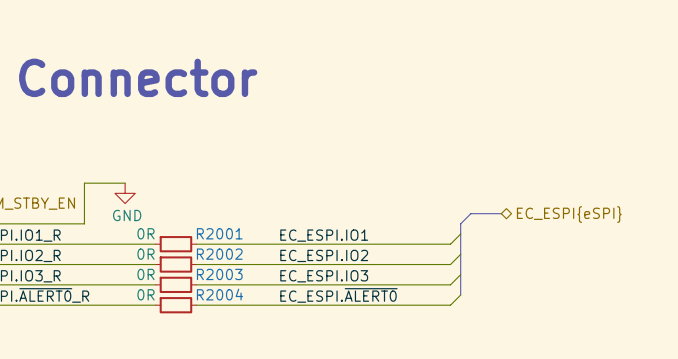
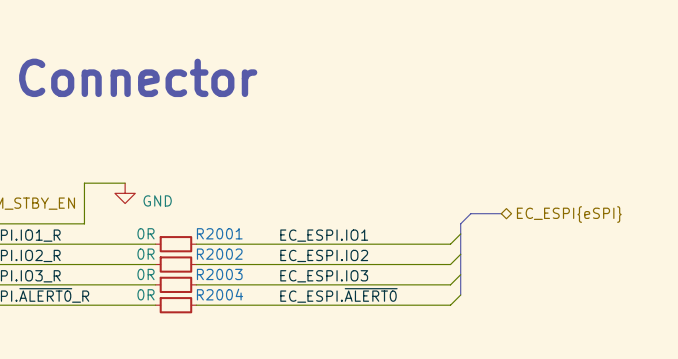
power symbol text position: GND (127, 215) -> GND (157, 200)

